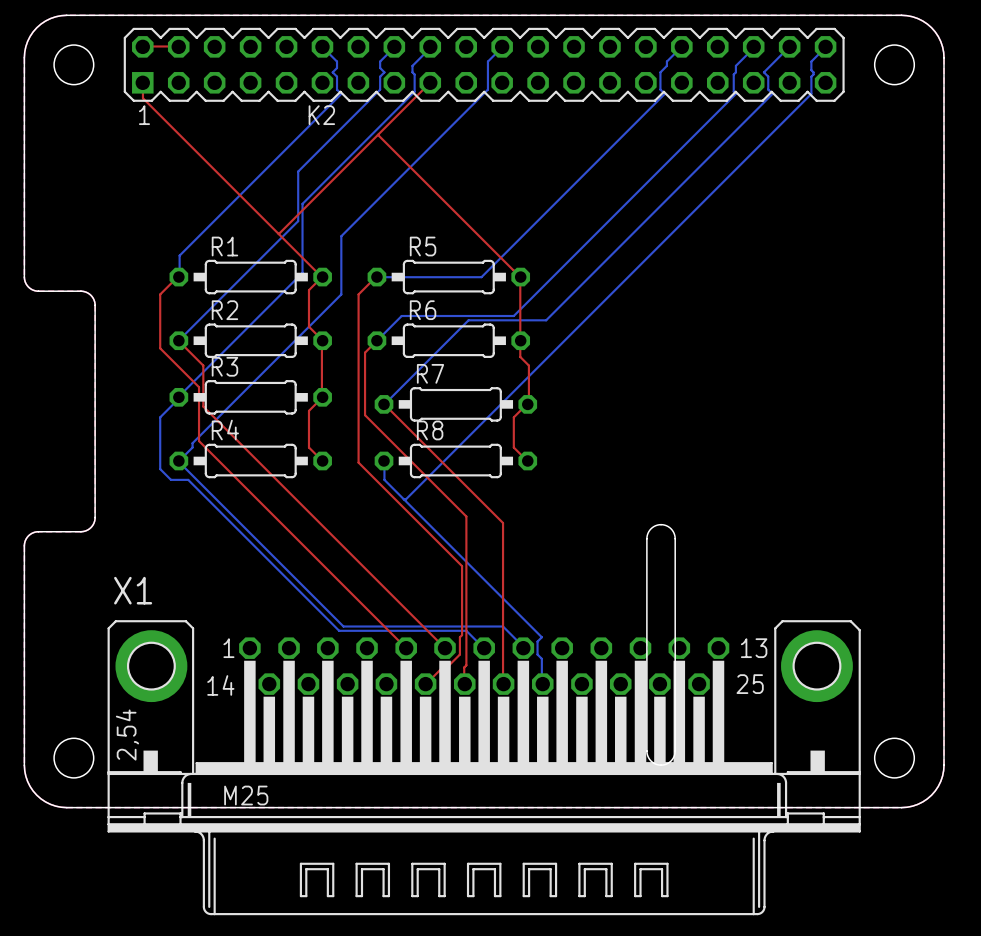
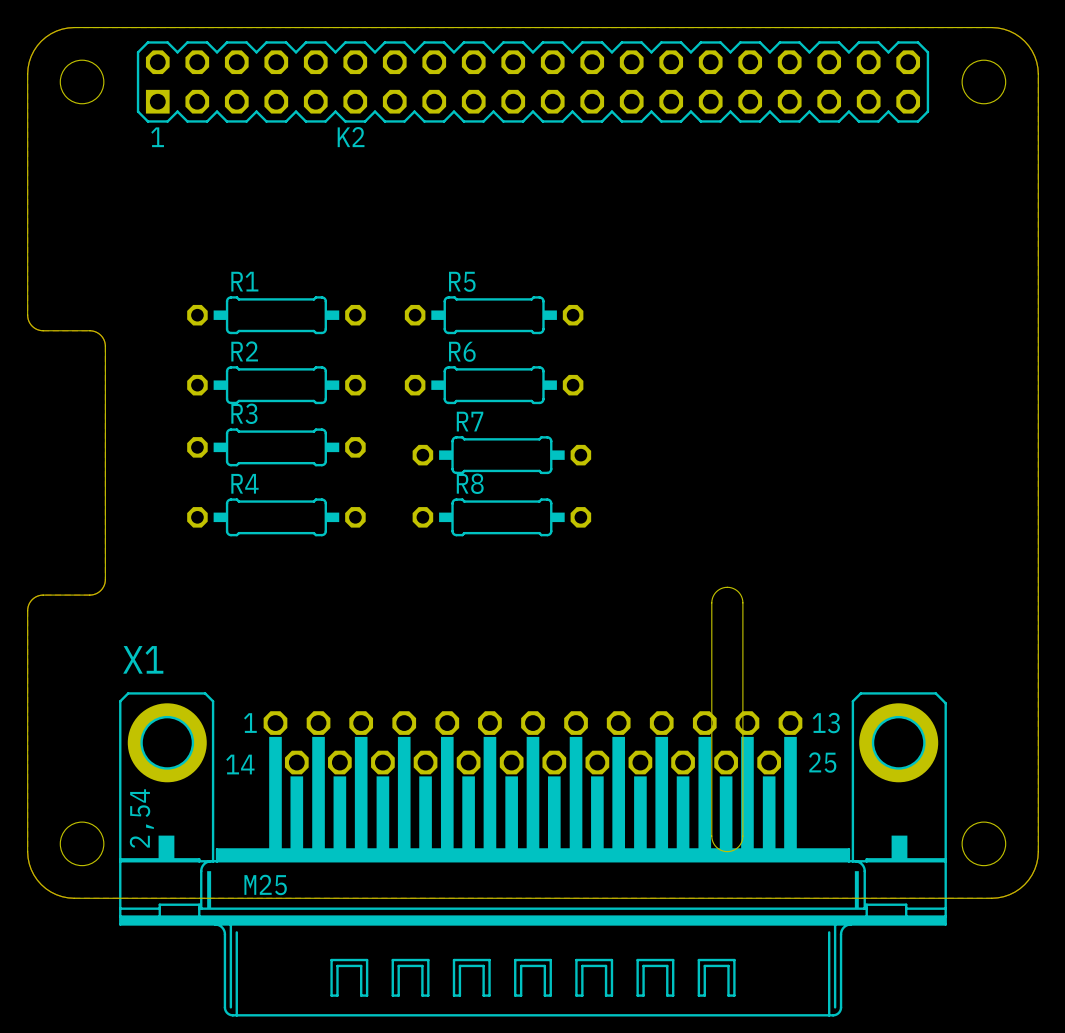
top track: (142, 46) (178, 46) -> none
bottom track: (322, 46) (337, 61) (337, 68) (332, 72) (337, 76) (337, 89) (341, 93) (179, 255) (178, 277) -> none
bottom track: (394, 46) (380, 61) (380, 68) (384, 72) (380, 76) (380, 89) (298, 171) (298, 221) (178, 340) -> none
bottom track: (430, 46) (412, 65) (414, 91) (302, 203) (302, 272) (160, 417) (160, 469) (170, 479) (188, 479) (339, 630) (466, 630) (484, 648) -> none
bottom track: (502, 46) (487, 61) (487, 89) (341, 236) (341, 294) (192, 443) (192, 447) (178, 460) (343, 626) (503, 626) (523, 648) -> none
bottom track: (681, 46) (666, 61) (666, 65) (660, 72) (660, 89) (664, 93) (481, 277) (376, 277) -> none
bottom track: (753, 46) (735, 65) (735, 72) (733, 74) (733, 91) (735, 93) (513, 316) (401, 316) (376, 340) -> none
bottom track: (789, 46) (763, 72) (768, 76) (768, 89) (772, 93) (546, 320) (468, 320) (384, 404) -> none
bottom track: (825, 46) (811, 61) (811, 70) (813, 72) (811, 76) (811, 93) (406, 499) (403, 499) -> none
top track: (142, 82) (142, 98) (321, 277) -> none
top track: (430, 82) (278, 234) -> none
top track: (377, 134) (520, 275) (520, 356) (528, 365) (528, 402) (513, 417) (513, 447) (527, 460) -> none
top track: (178, 277) (160, 294) (160, 348) (199, 387) (199, 441) (406, 648) -> none
top track: (321, 277) (308, 290) (308, 326) (322, 340) (322, 397) (308, 410) (308, 447) (322, 460) -> none
top track: (376, 277) (358, 294) (358, 462) (462, 566) (462, 635) (459, 637) (459, 654) (444, 669) (440, 669) (425, 684) -> none
top track: (178, 340) (203, 365) (203, 406) (444, 648) -> none
top track: (376, 340) (365, 352) (365, 415) (466, 516) (464, 684) -> none
top track: (384, 404) (503, 523) (503, 684) -> none
bottom track: (384, 460) (384, 479) (541, 637) (537, 641) (537, 654) (541, 658) (542, 684) -> none

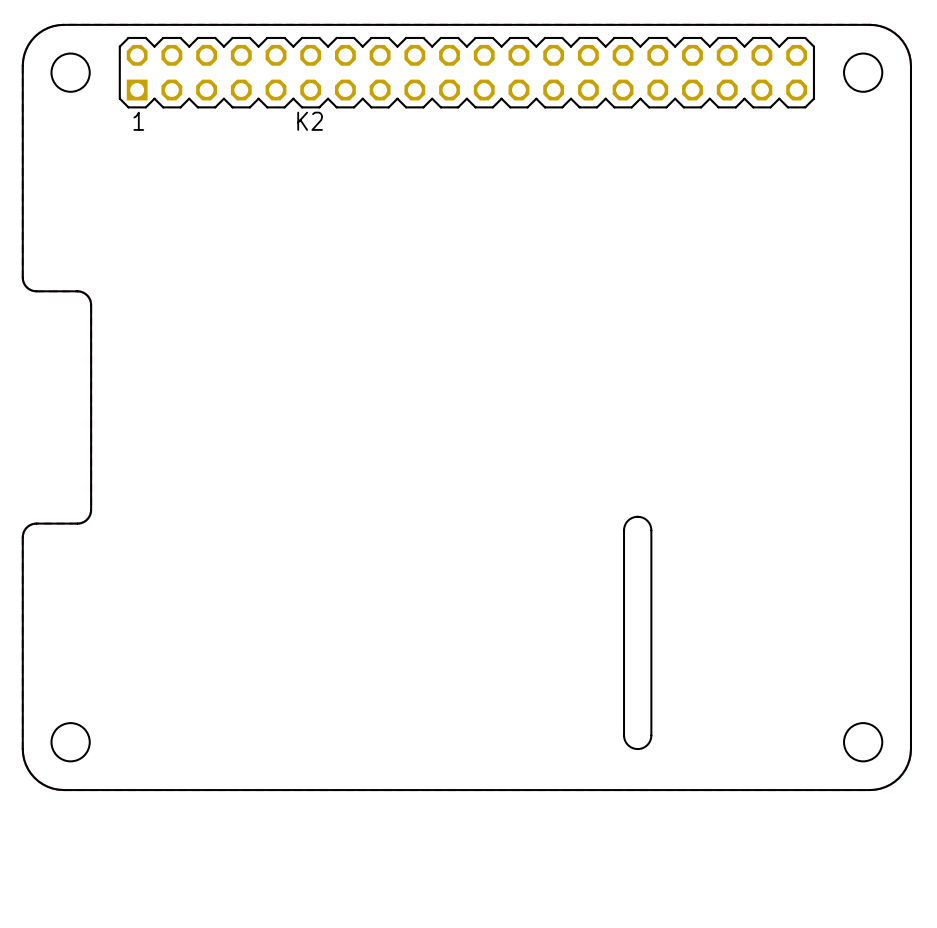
R1: (276, 315) -> none
R5: (494, 315) -> none
R2: (276, 385) -> none
R6: (494, 385) -> none
R3: (276, 447) -> none
R7: (501, 455) -> none
R4: (276, 517) -> none
R8: (501, 517) -> none
X1: (532, 854) -> none

